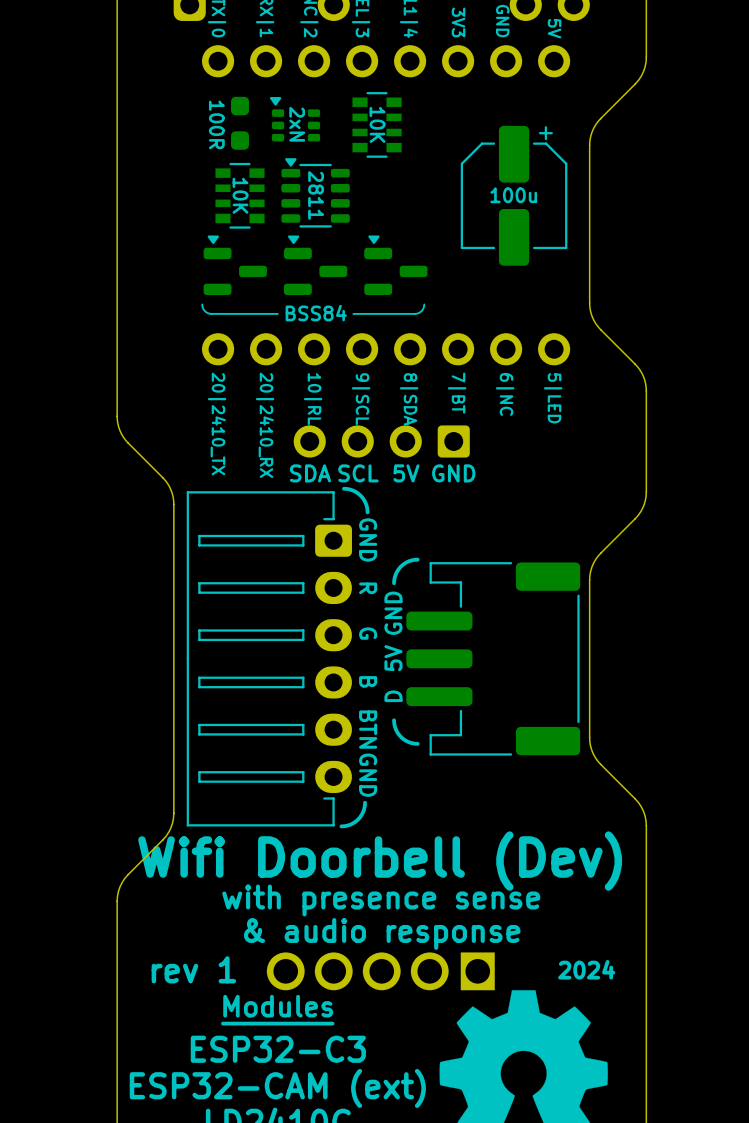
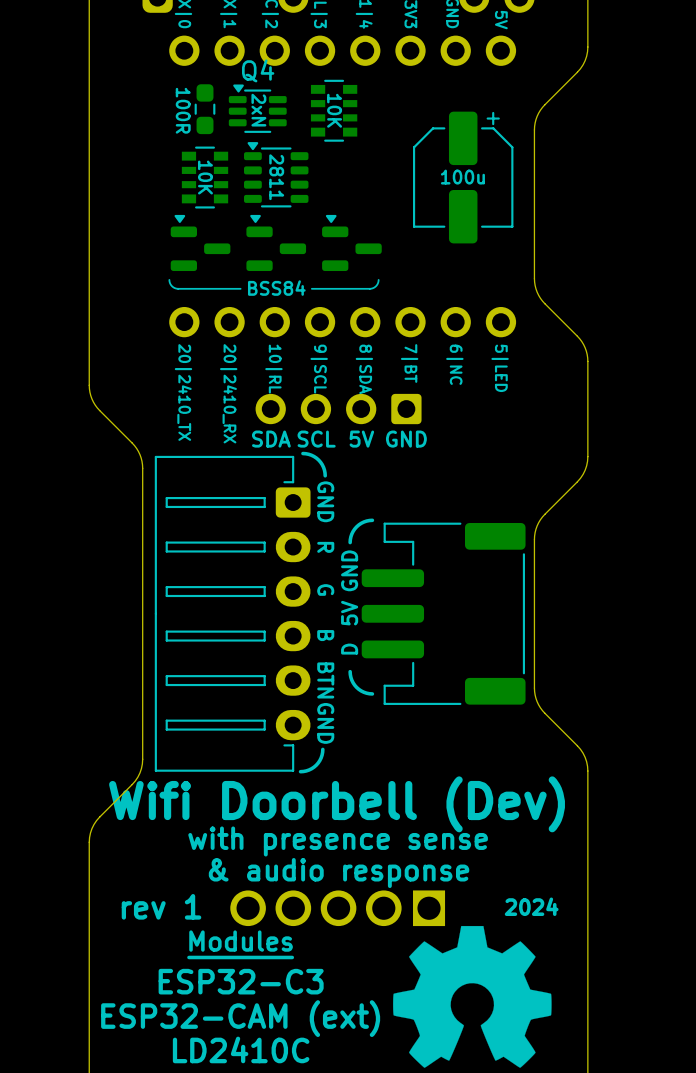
part footprint: [231, 96, 249, 150] -> [194, 84, 216, 135]
part: (295, 119) -> none
Q4: none -> (257, 108)

